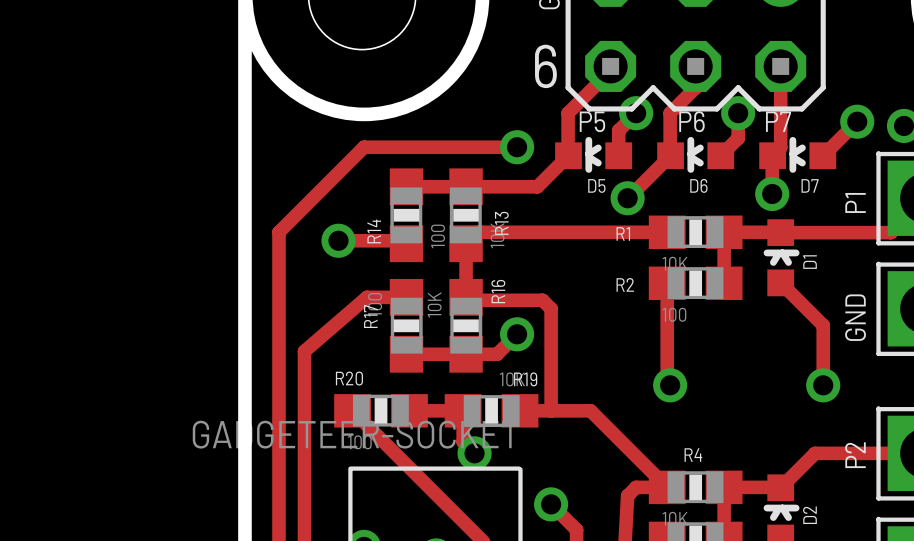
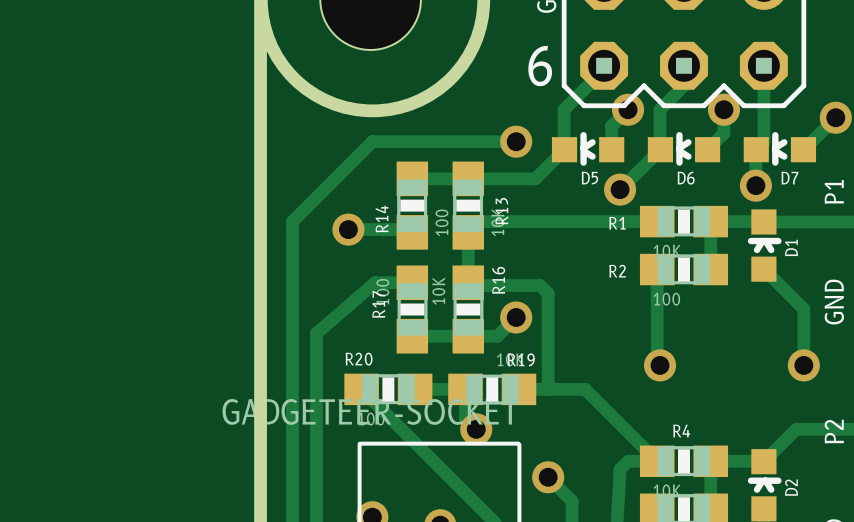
text: P5 (592, 121) -> none
text: P6 (691, 121) -> none
text: P7 (778, 121) -> none

